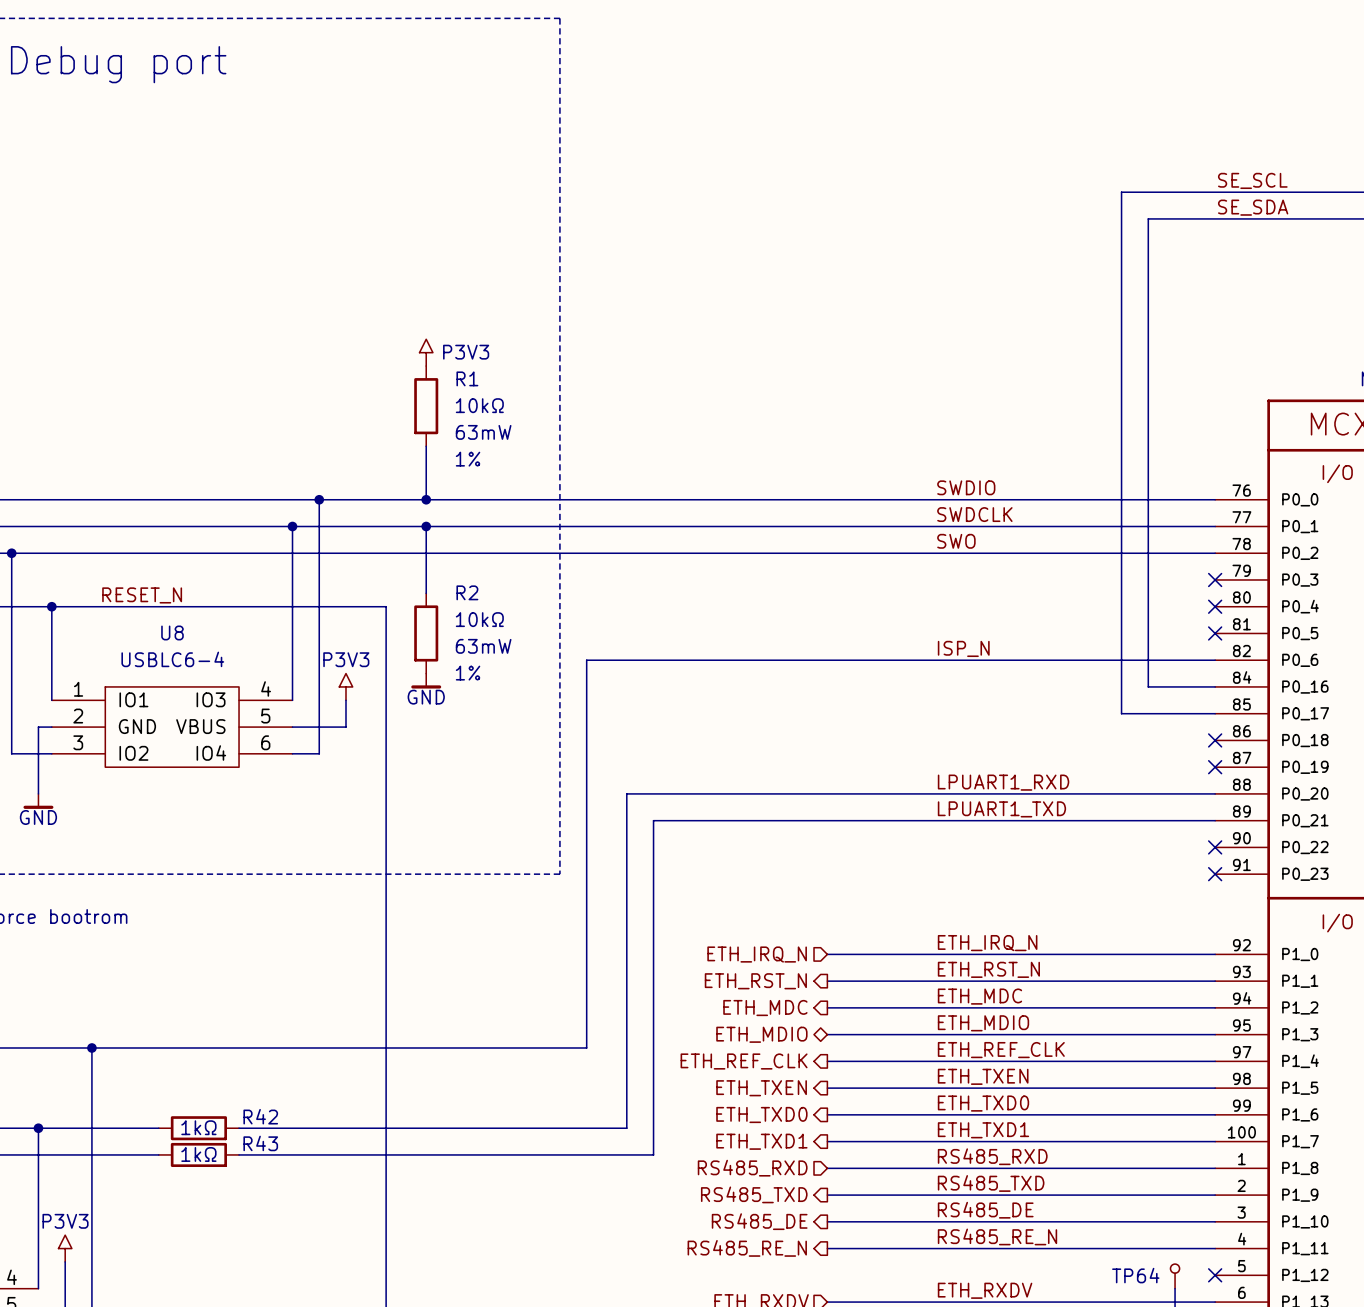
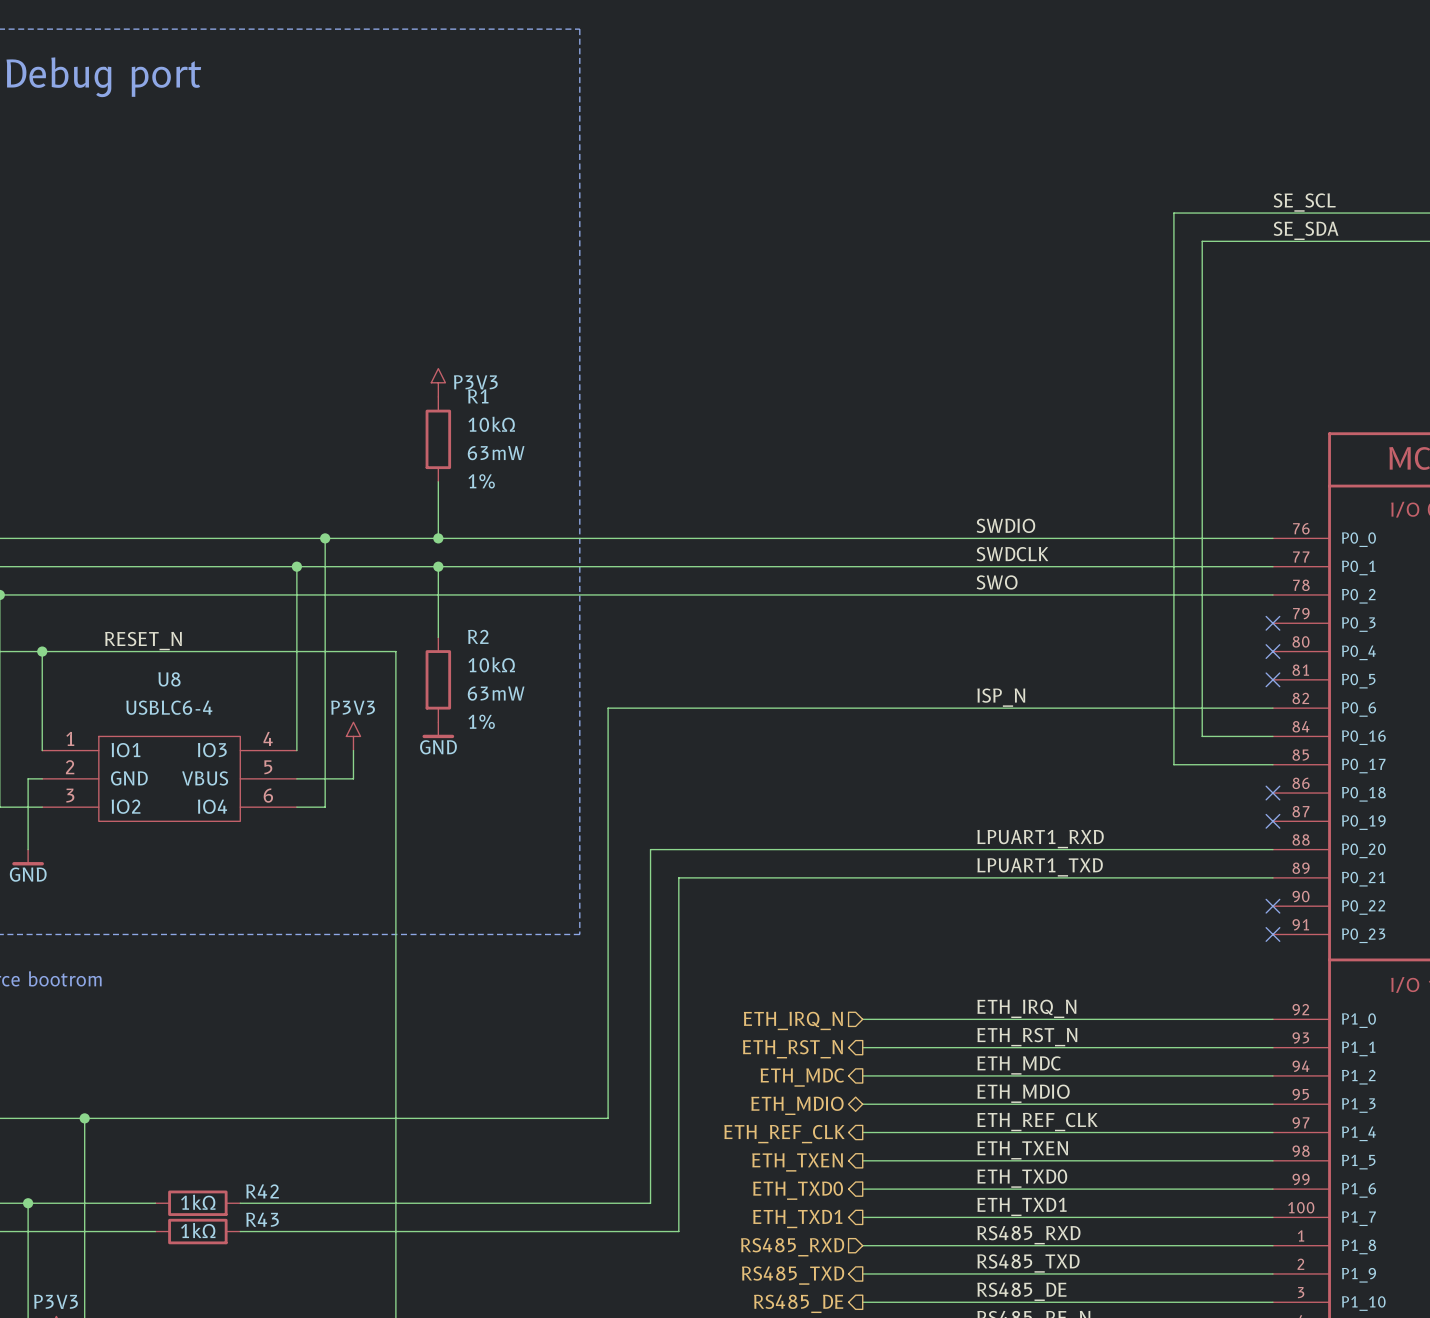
R1 name position: R1 (467, 378) -> R1 (478, 396)
R1 value position: 10kΩ (479, 405) -> 10kΩ (491, 424)
R1 text position: 63mW (483, 432) -> 63mW (496, 453)
R1 text position: 1% (468, 459) -> 1% (481, 481)

